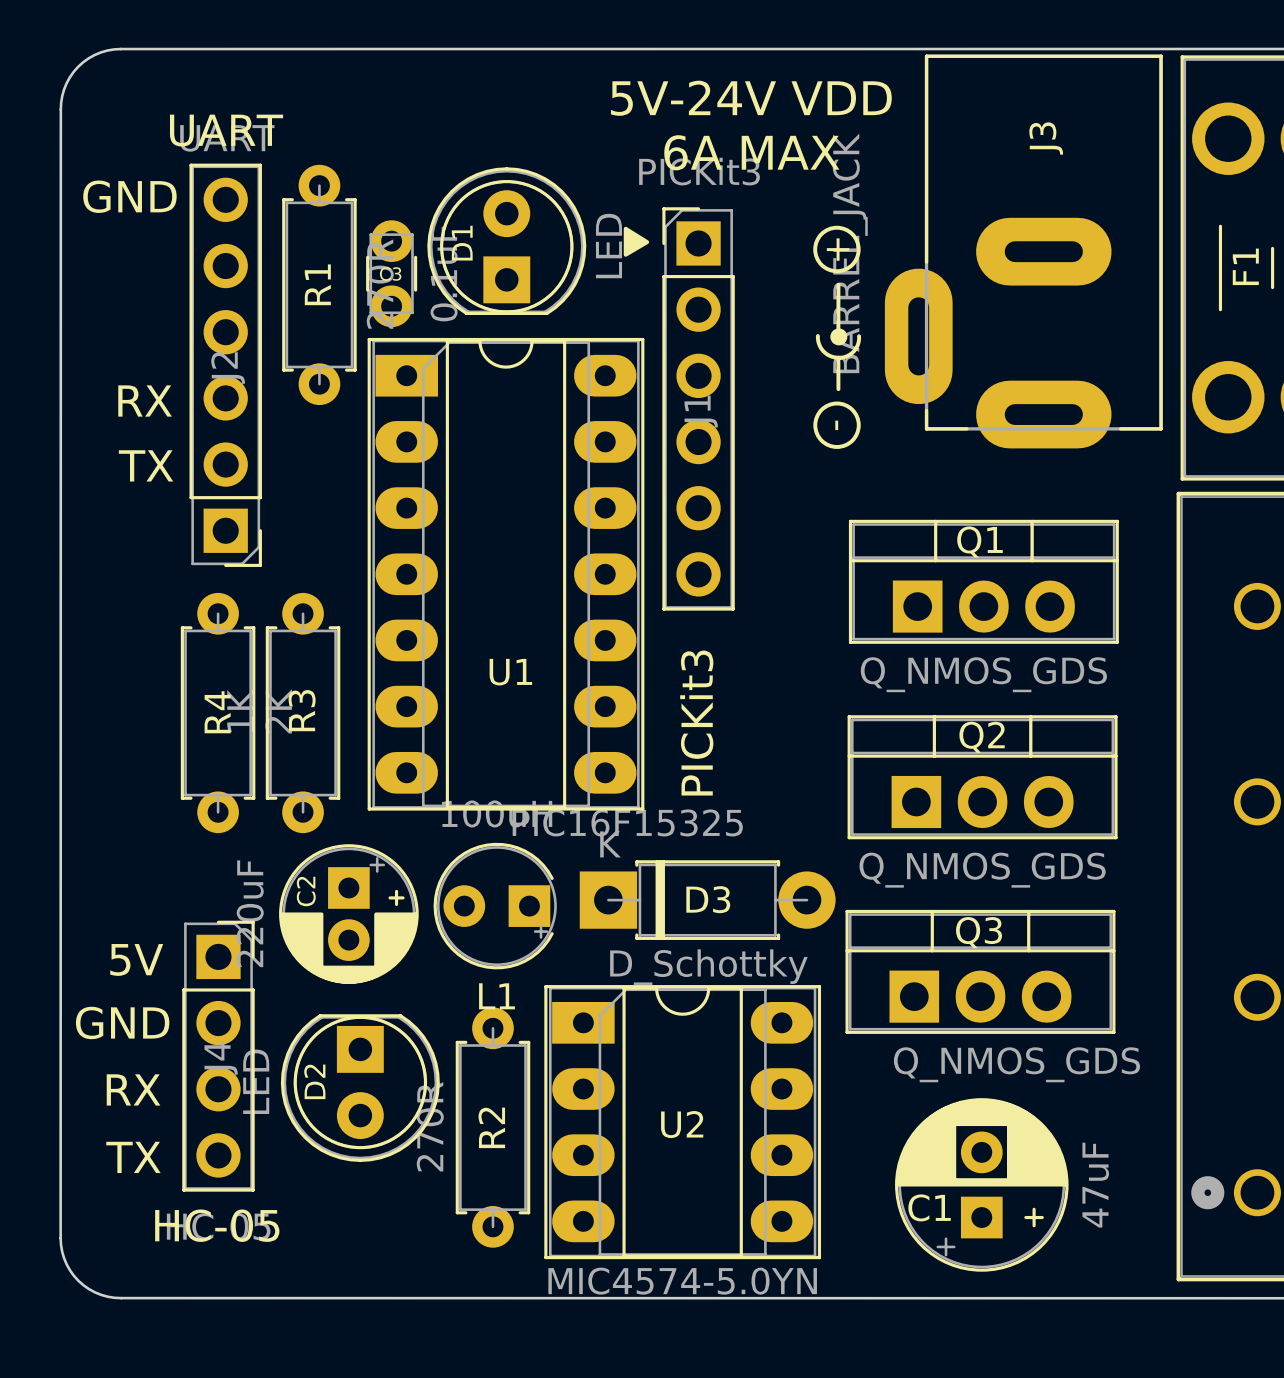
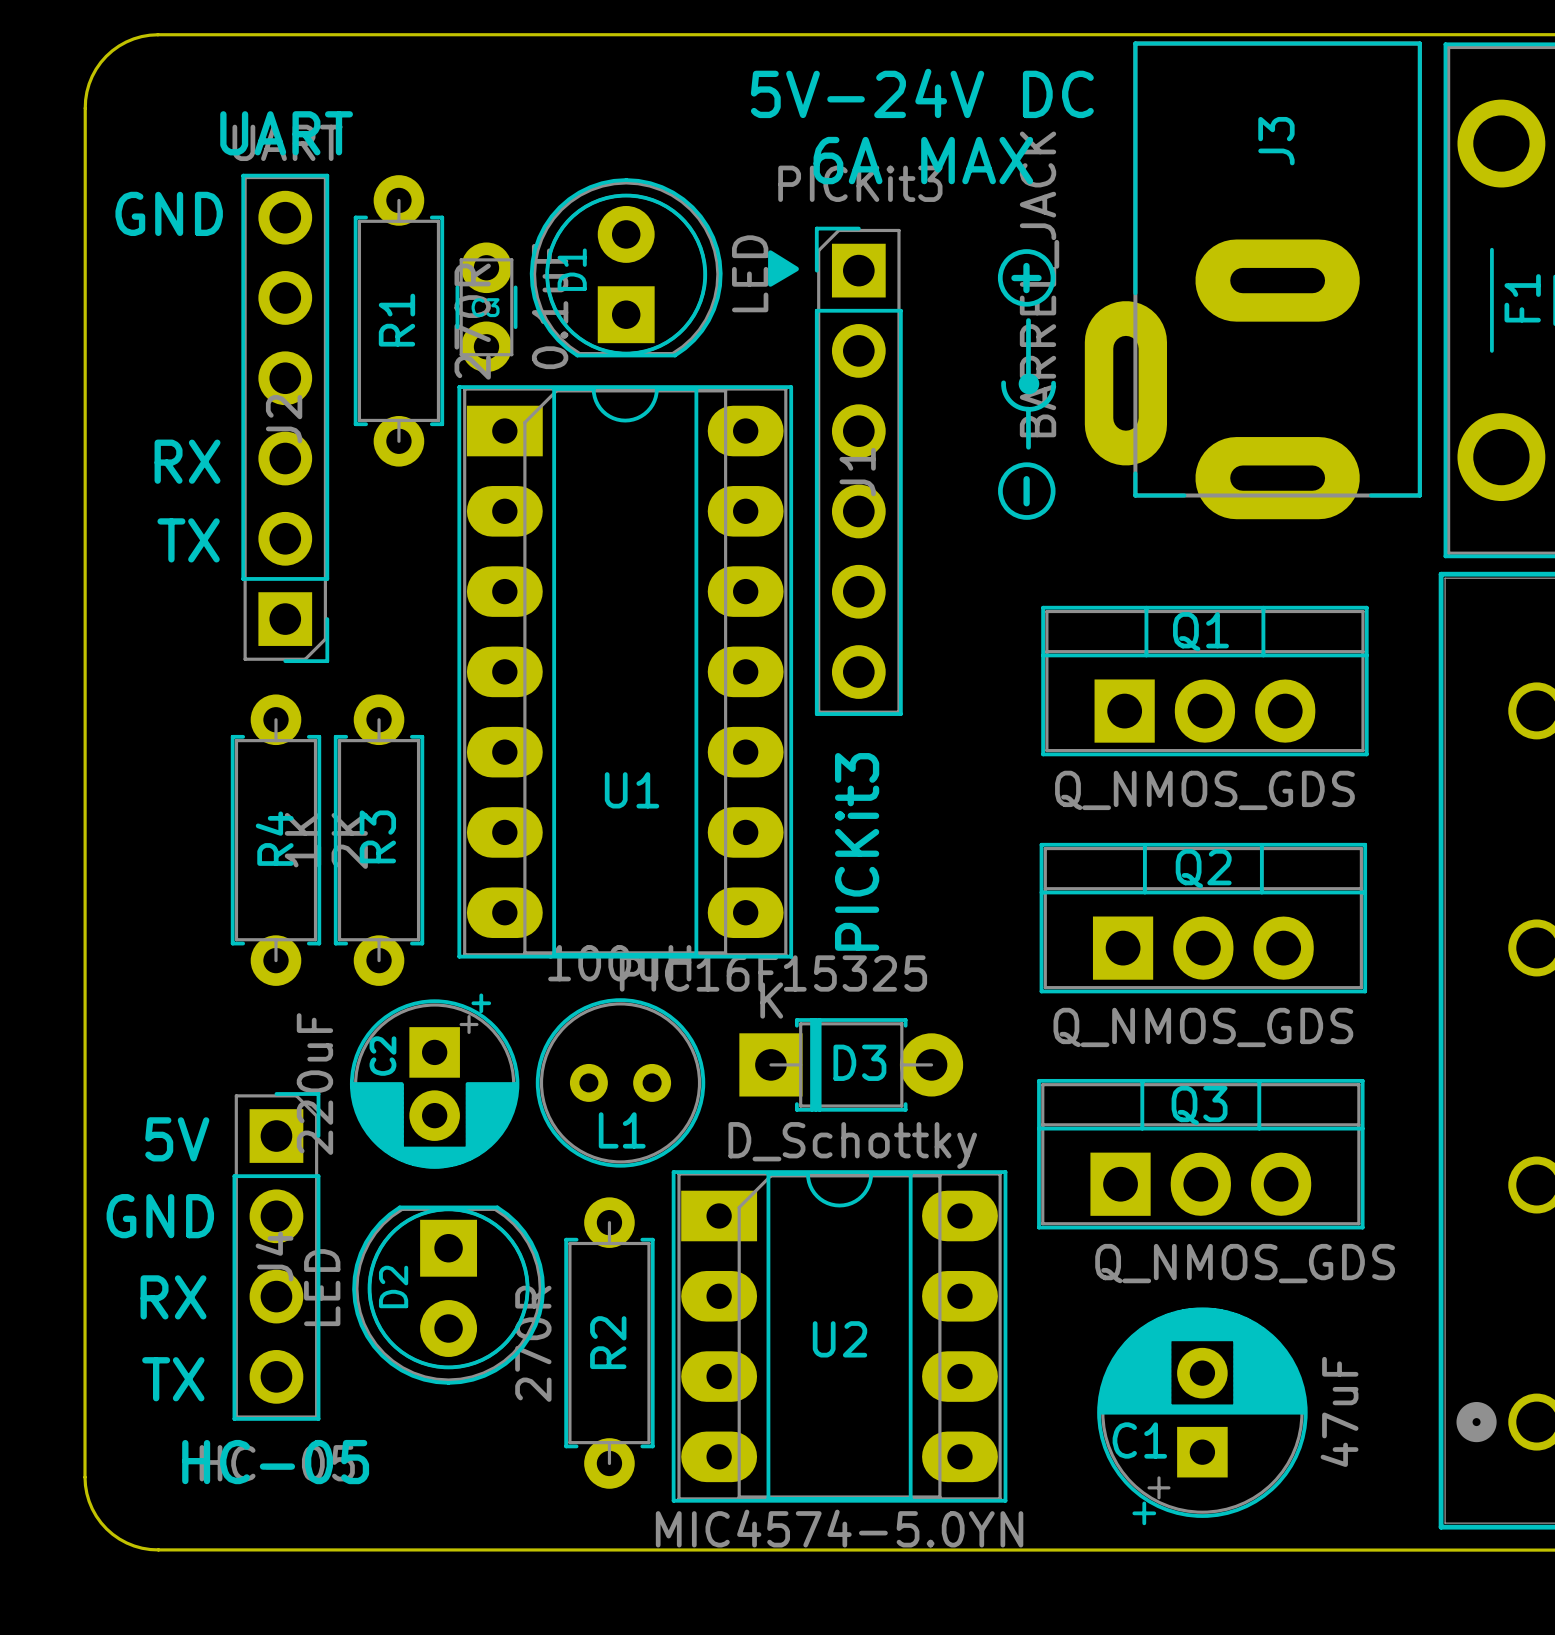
text: 5V-24V VDD (751, 98) -> 5V-24V DC (922, 93)
L1 footprint: [433, 842, 557, 970] -> [535, 998, 706, 1168]
C2 footprint: [279, 844, 419, 984] -> [349, 993, 520, 1169]
D3 footprint: [579, 860, 836, 940] -> [739, 1018, 964, 1112]
C1 footprint: [895, 1098, 1069, 1272] -> [1097, 1307, 1308, 1526]

